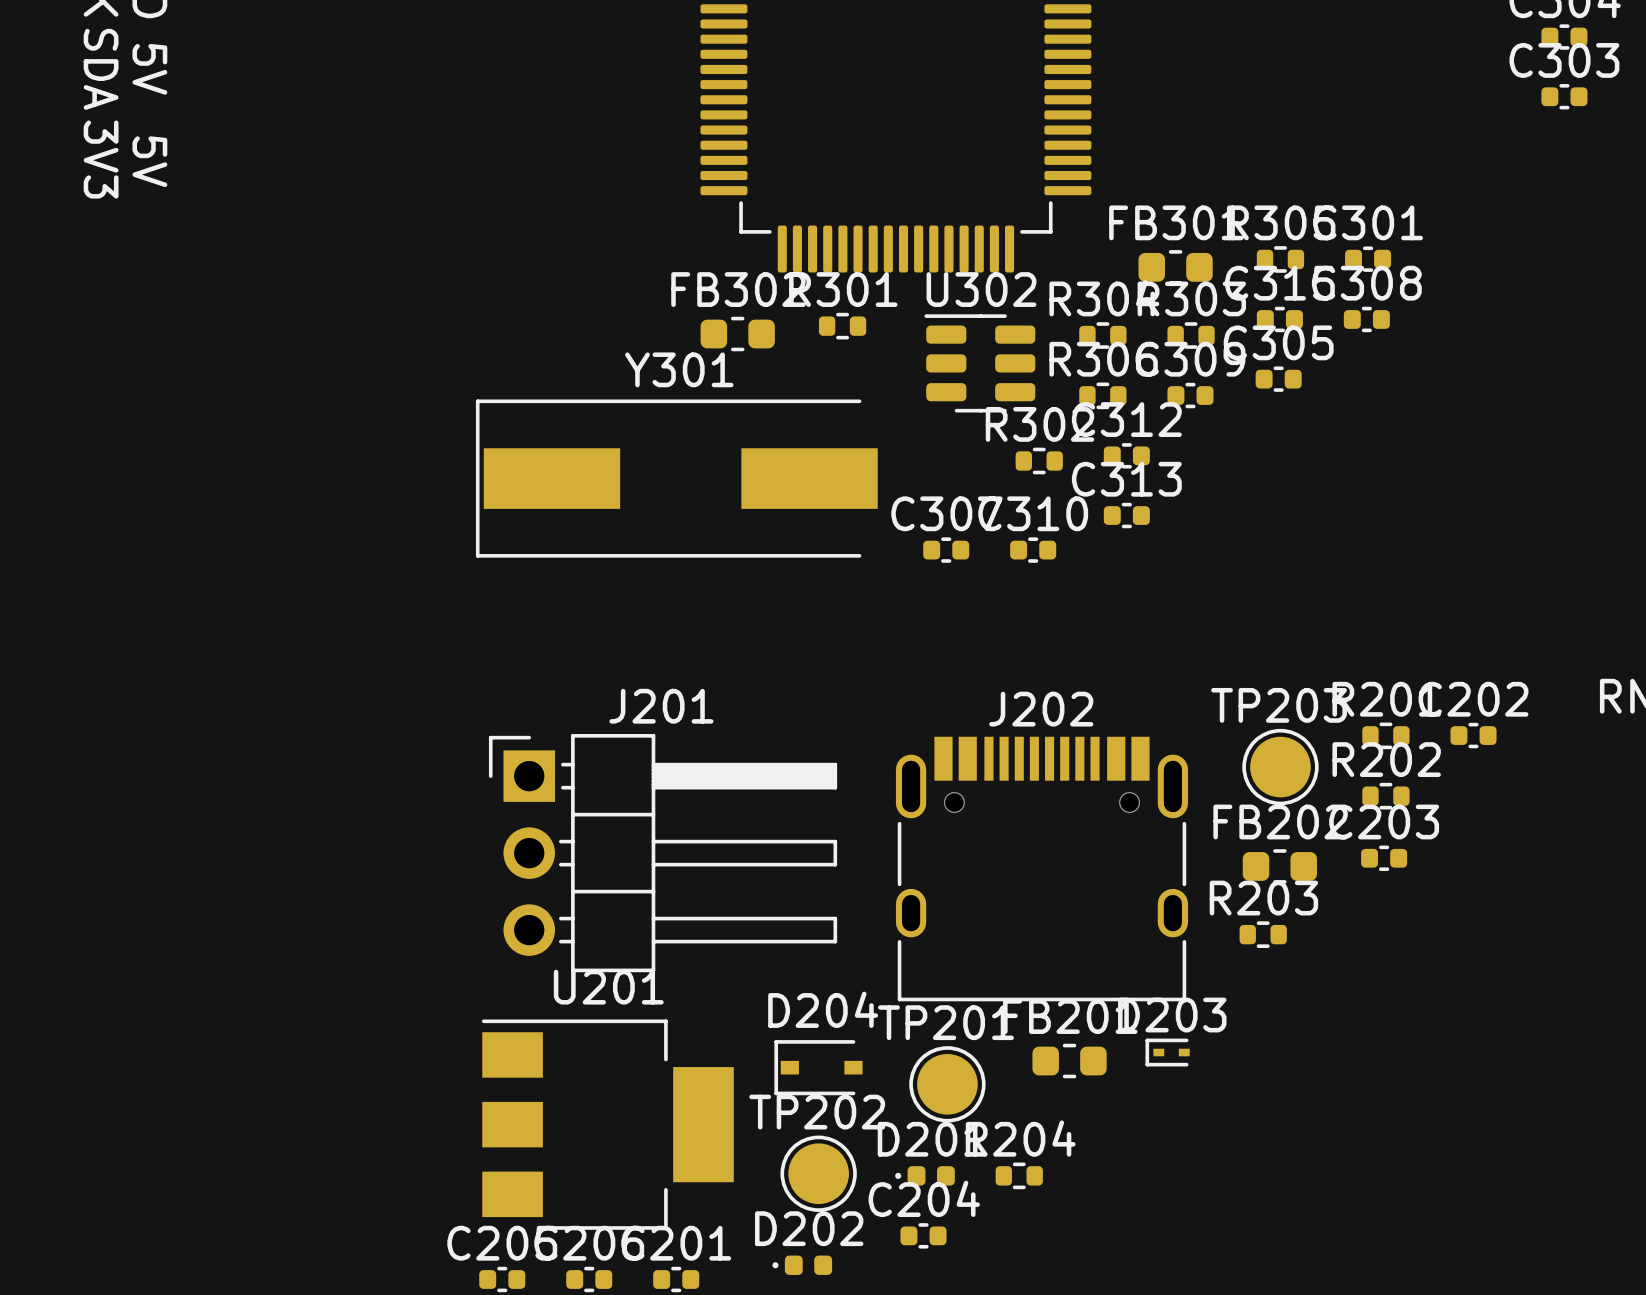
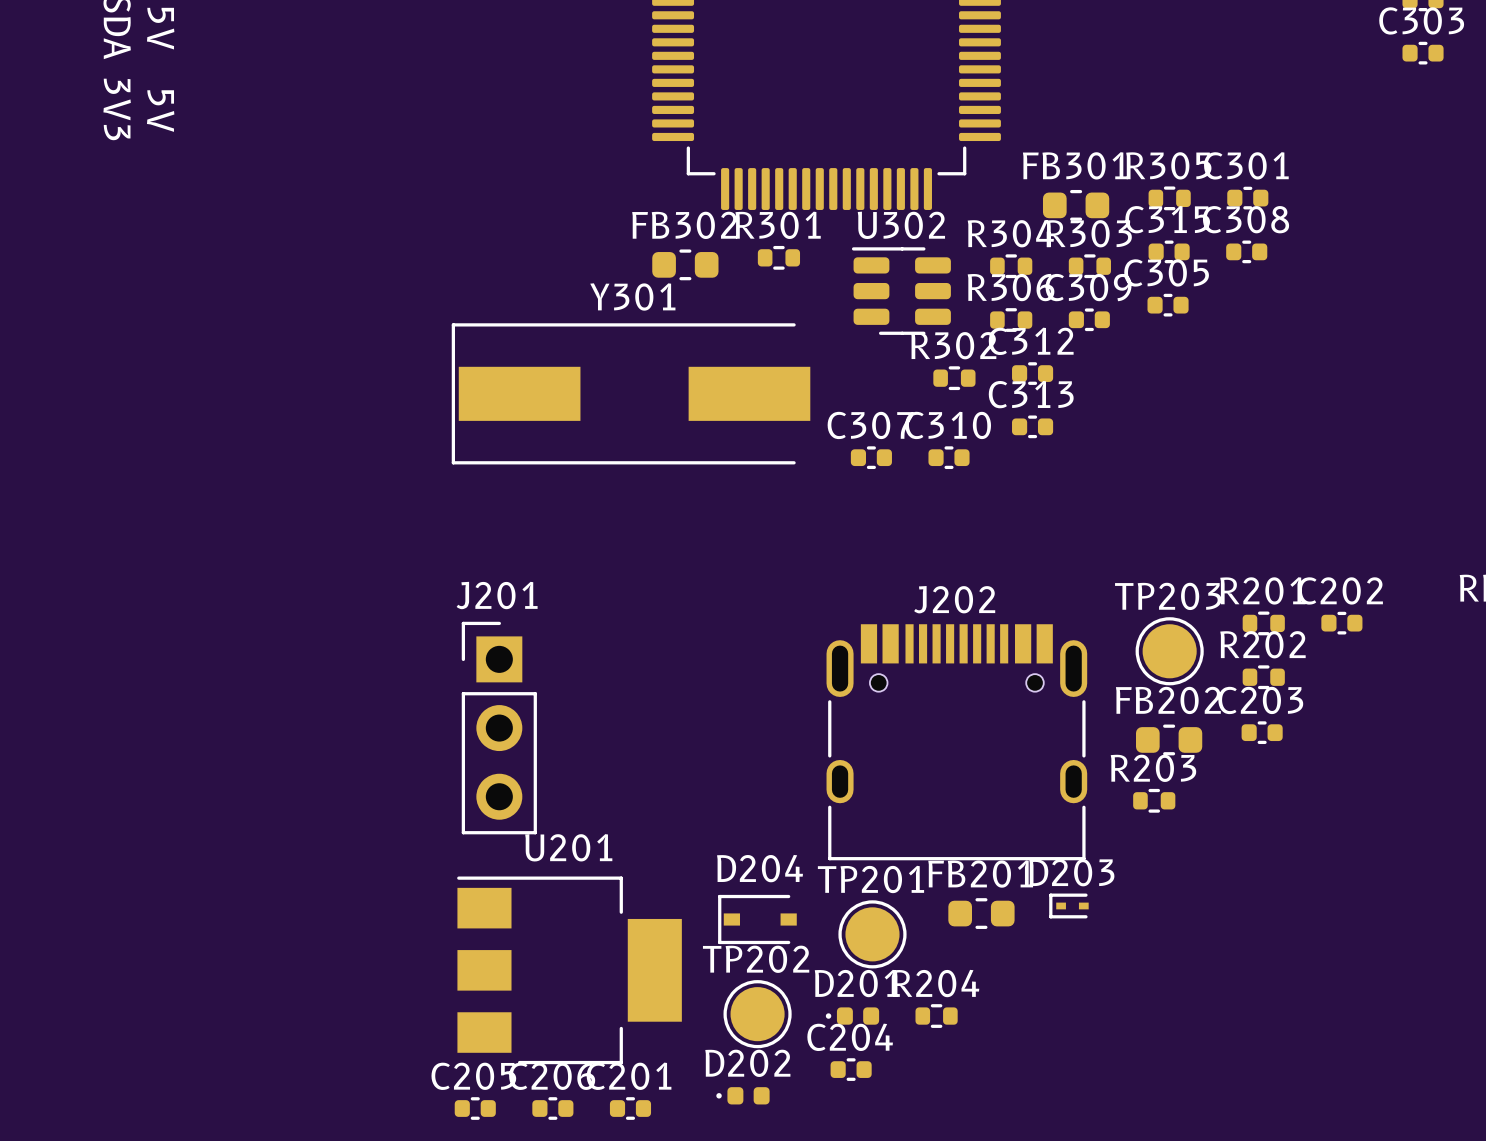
J201 footprint: [488, 734, 838, 973] -> [461, 621, 537, 835]

